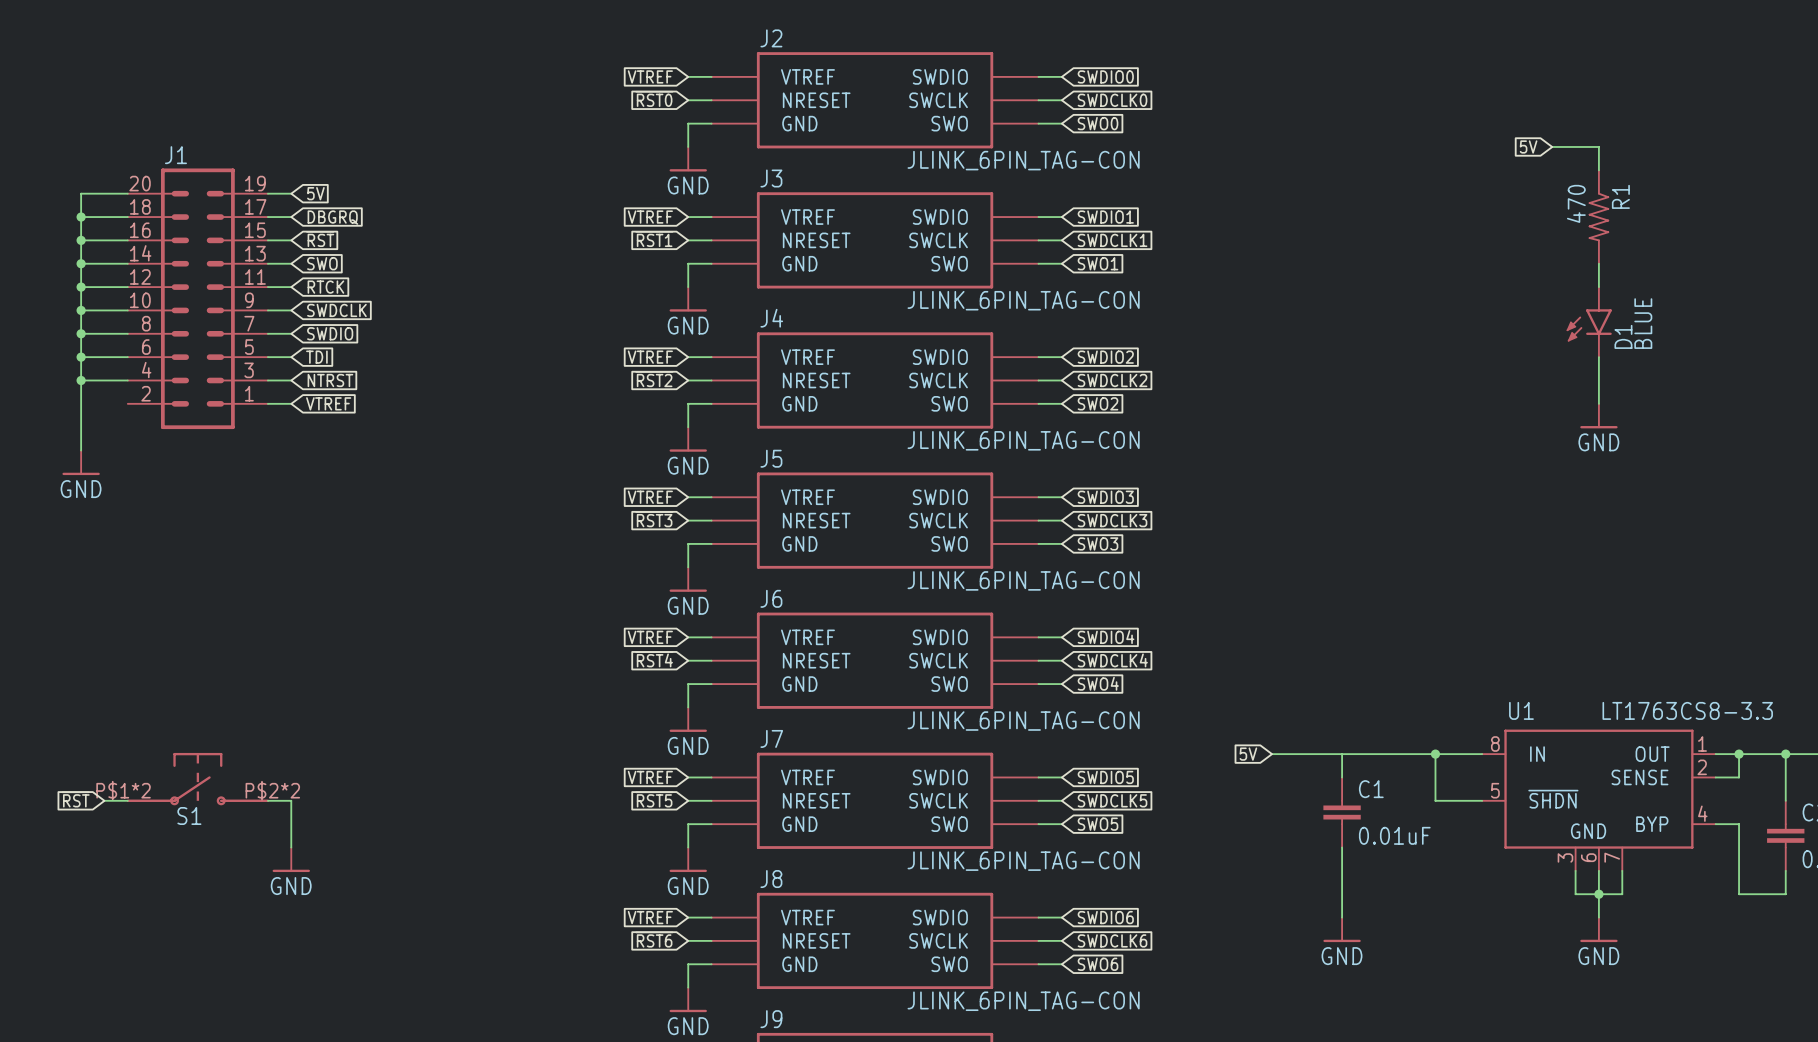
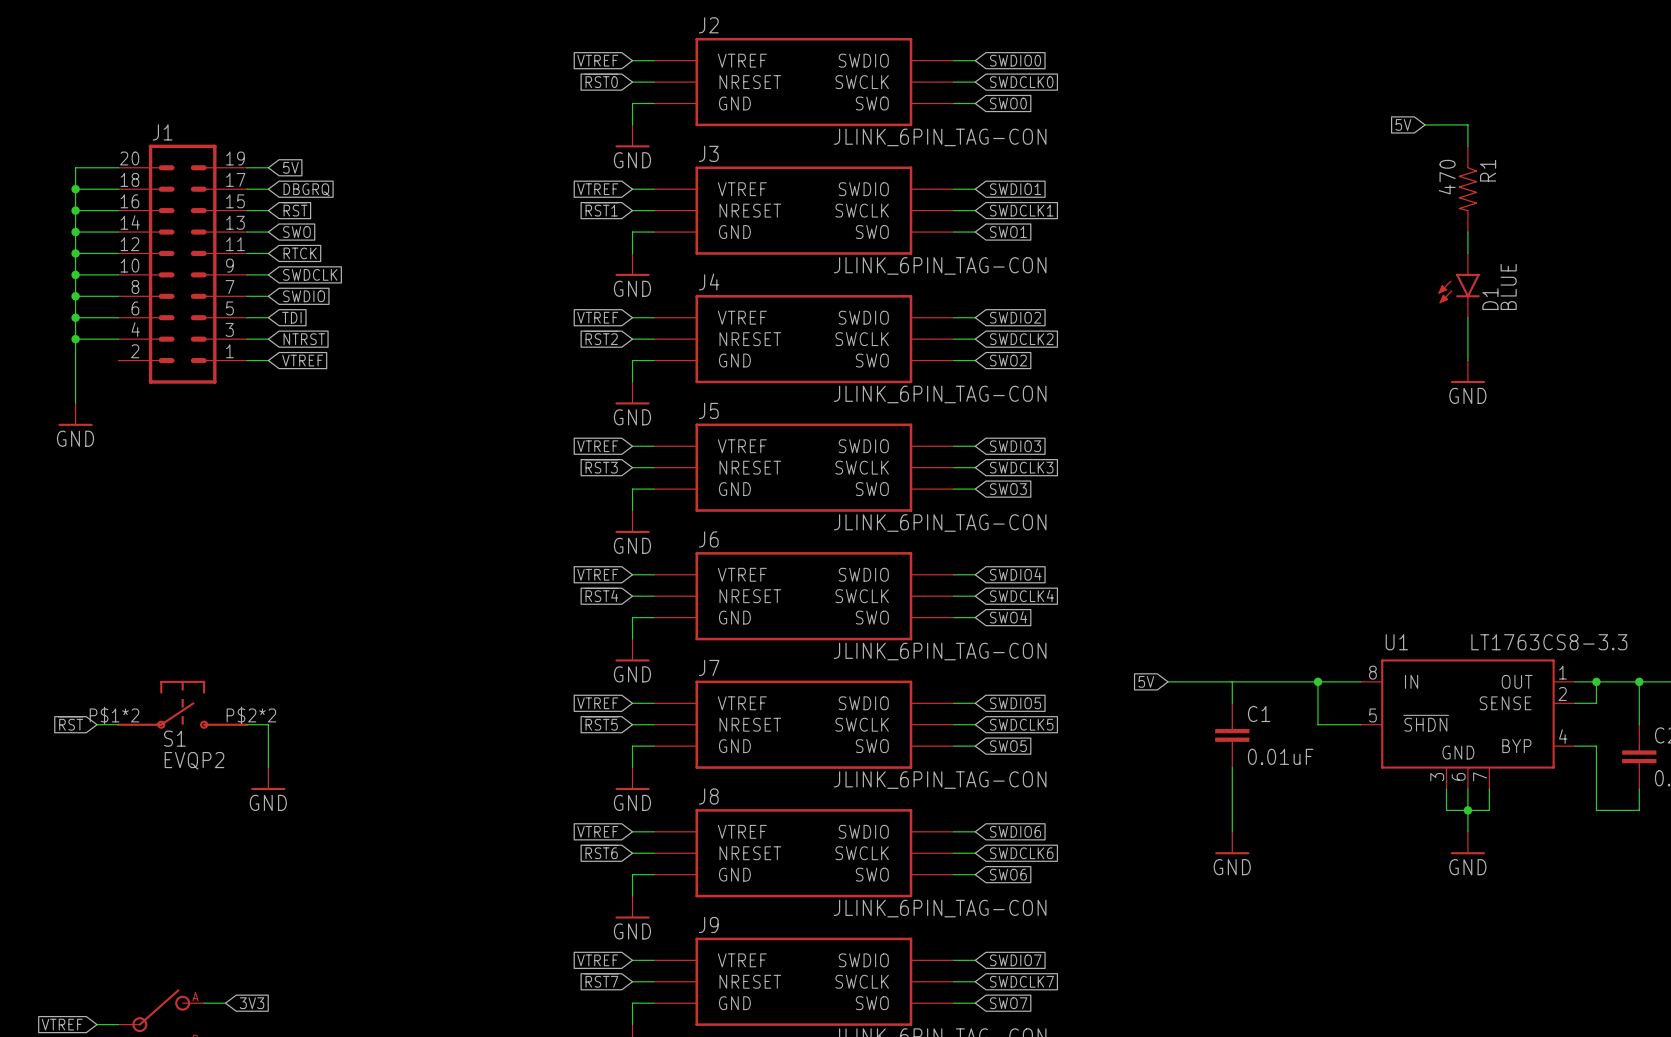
S1 value: none -> EVQP2 (194, 760)

